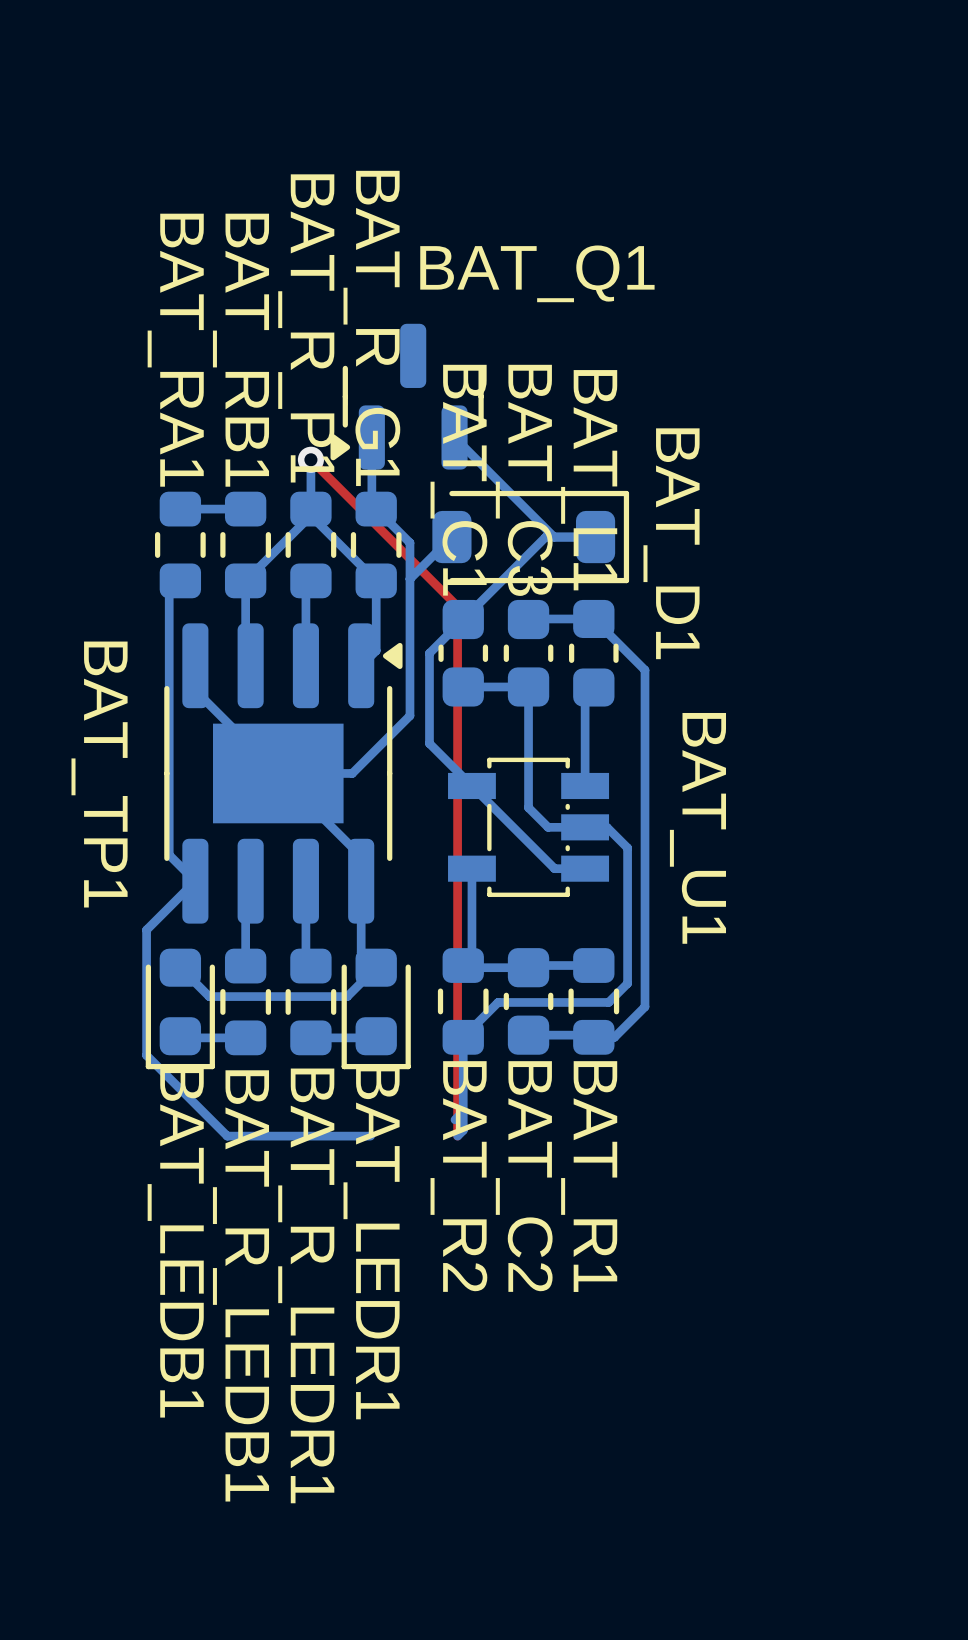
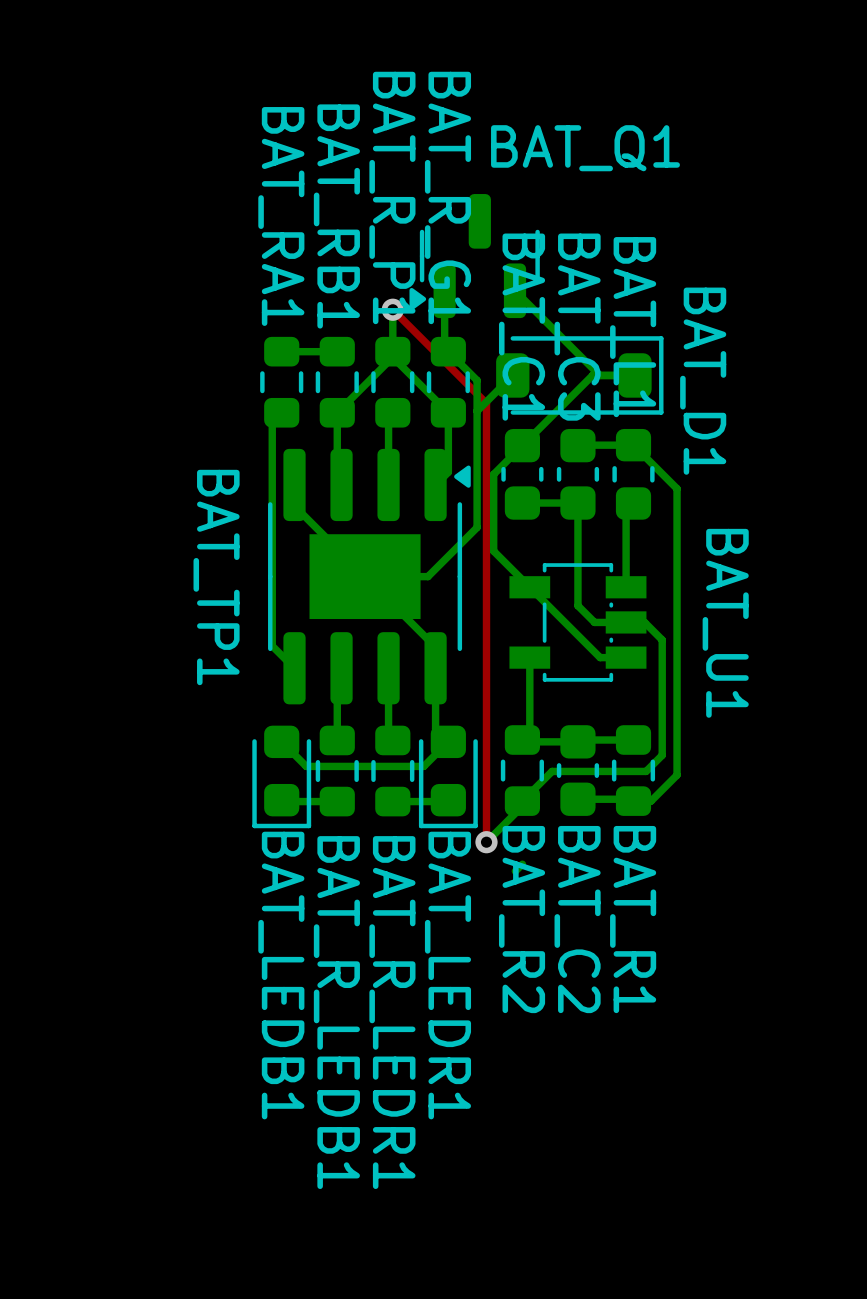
top track: (421, 569) (457, 606) (457, 1136) -> (486, 403) (486, 842)
bottom track: (195, 881) (146, 929) (146, 1055) (227, 1136) (370, 1136) -> none
bottom track: (463, 1043) (463, 1130) (457, 1136) -> (522, 806) (486, 842)
via: none -> (486, 842)

